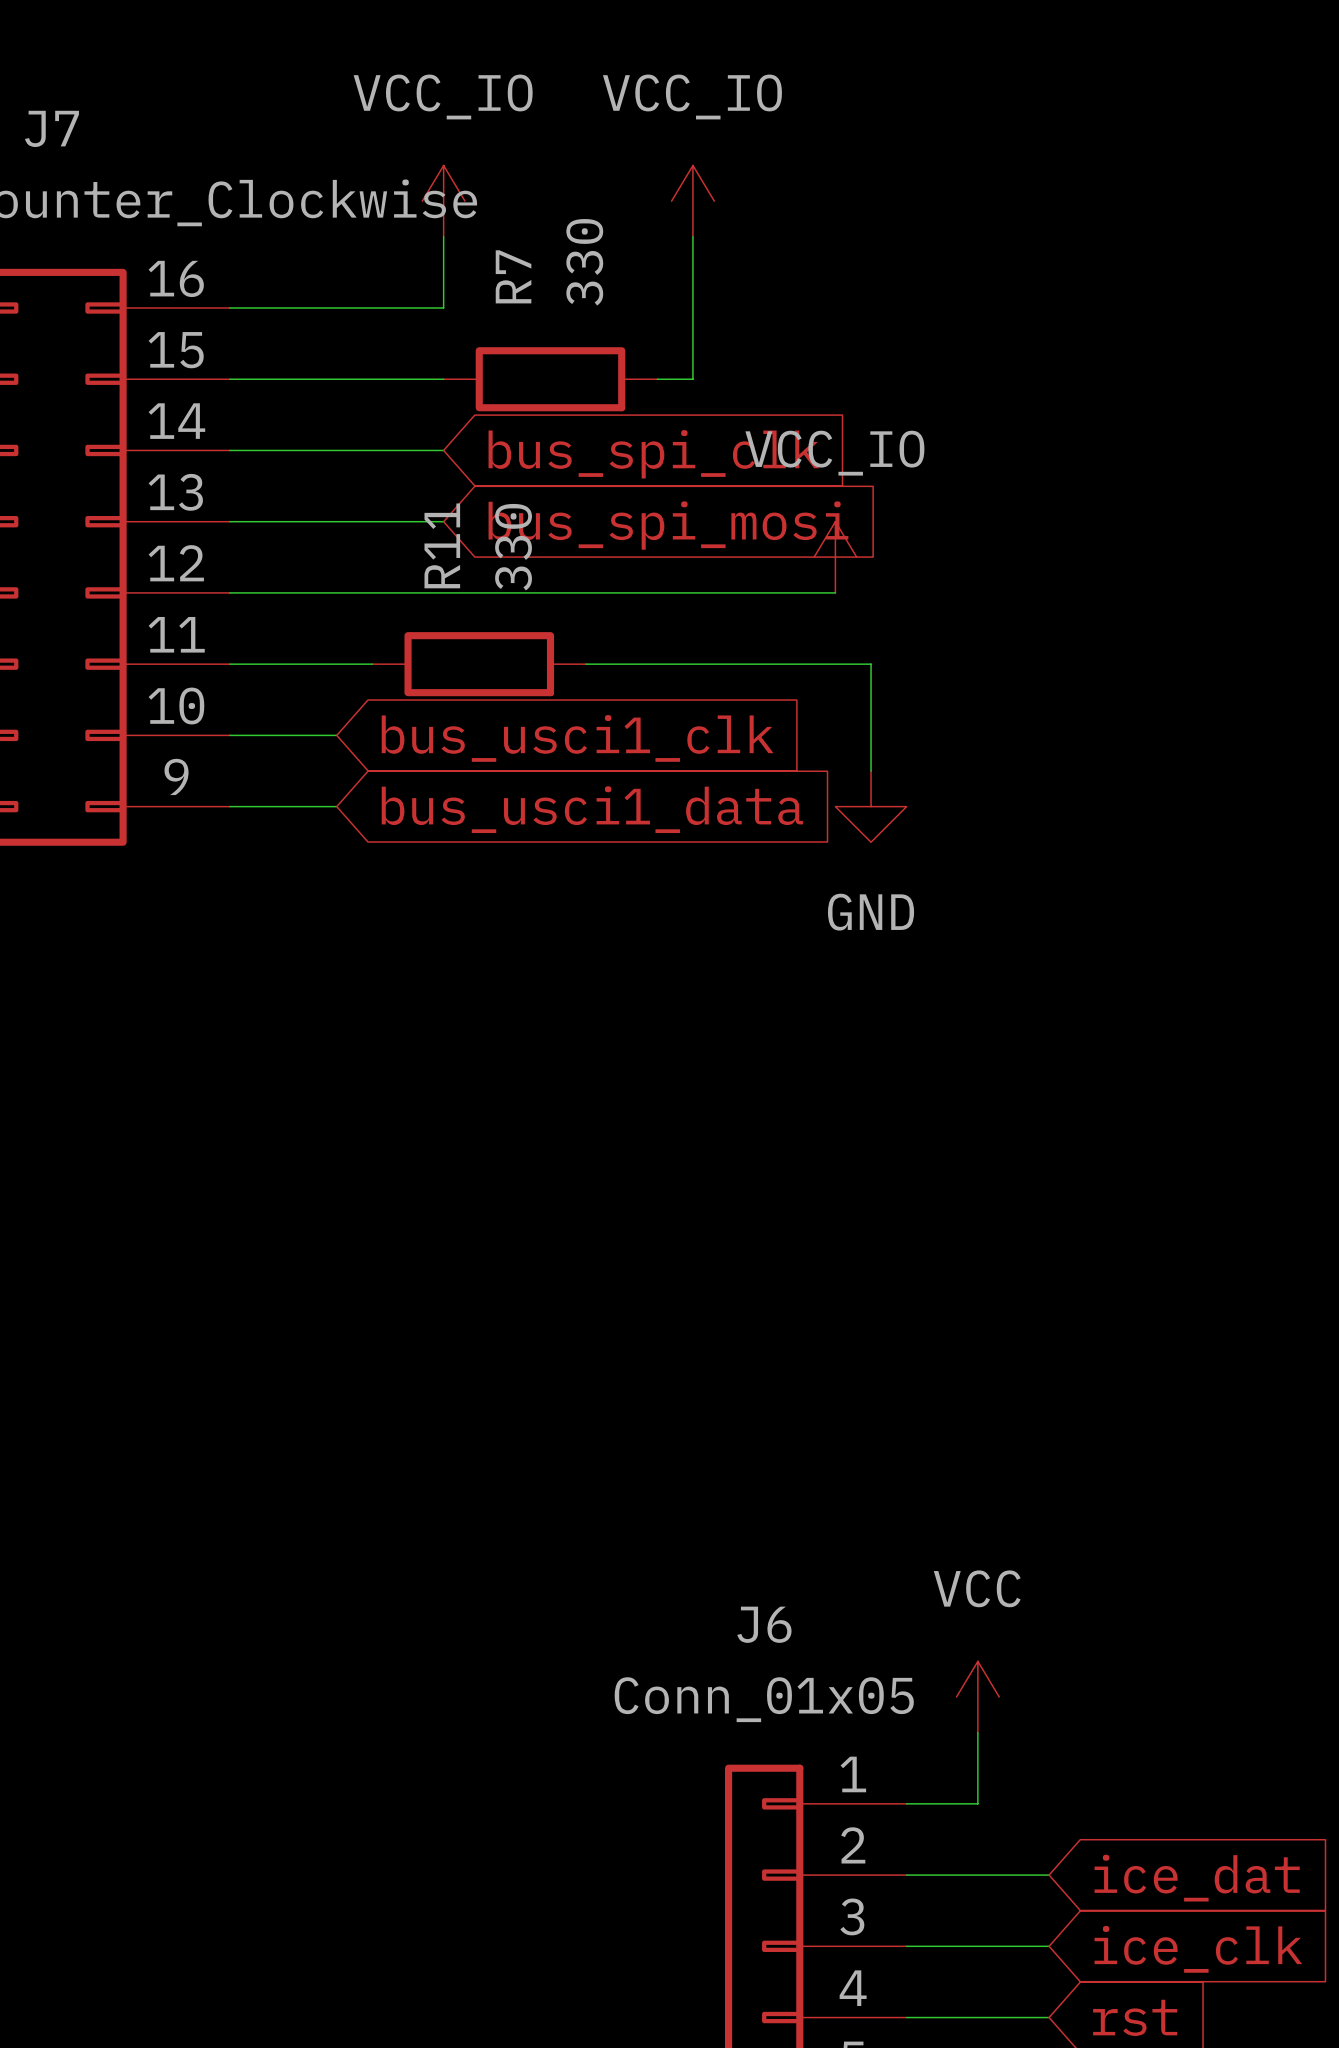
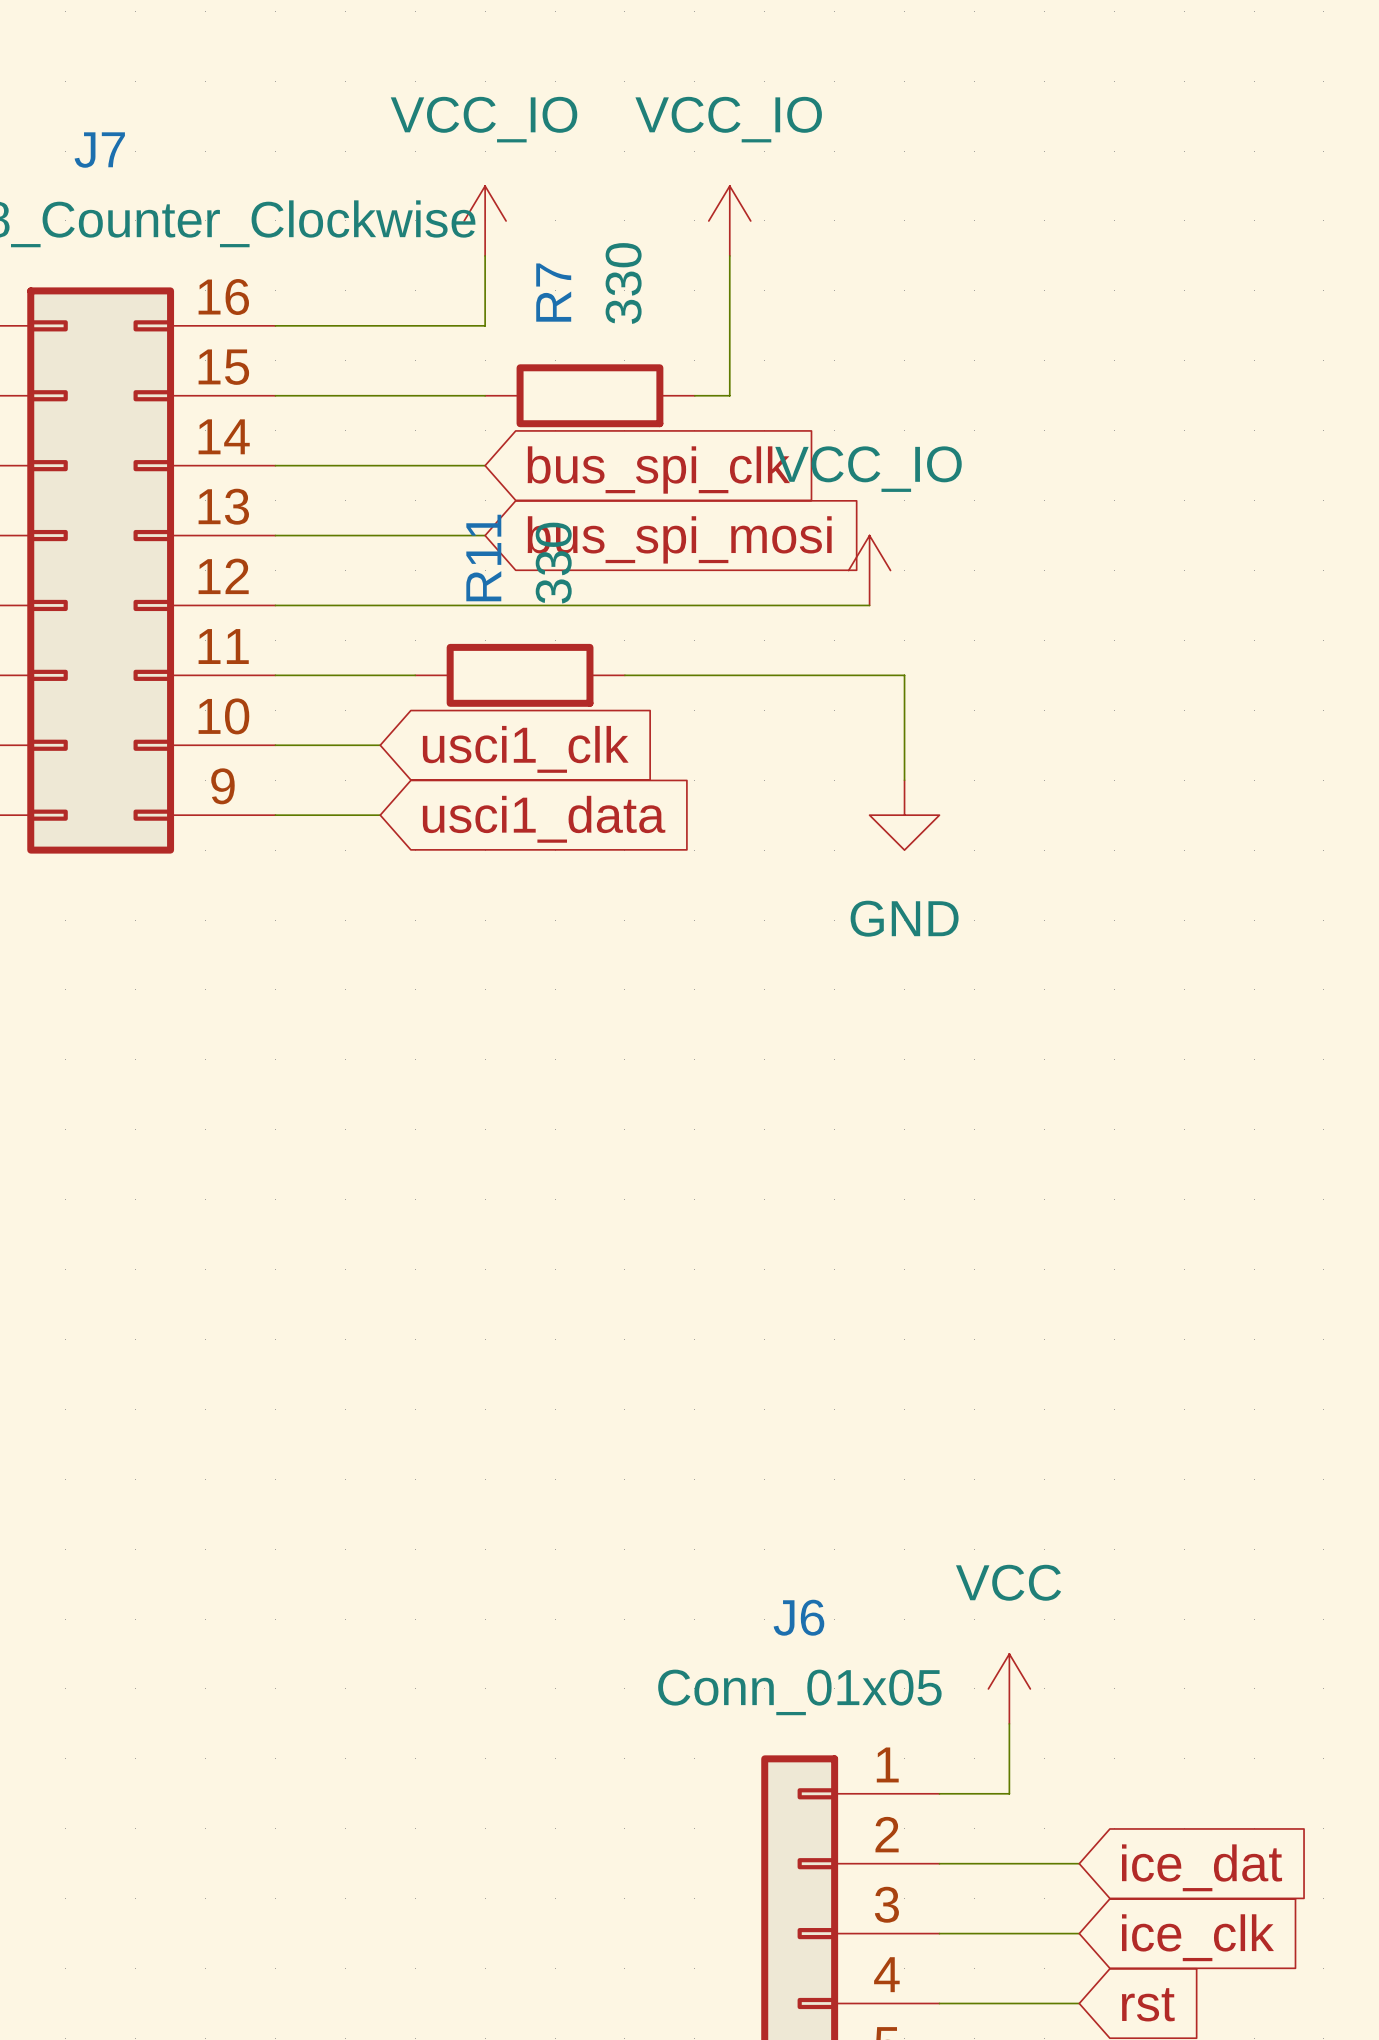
global label: bus_usci1_clk (577, 738) -> usci1_clk (525, 749)
global label: bus_usci1_data (592, 809) -> usci1_data (544, 819)

